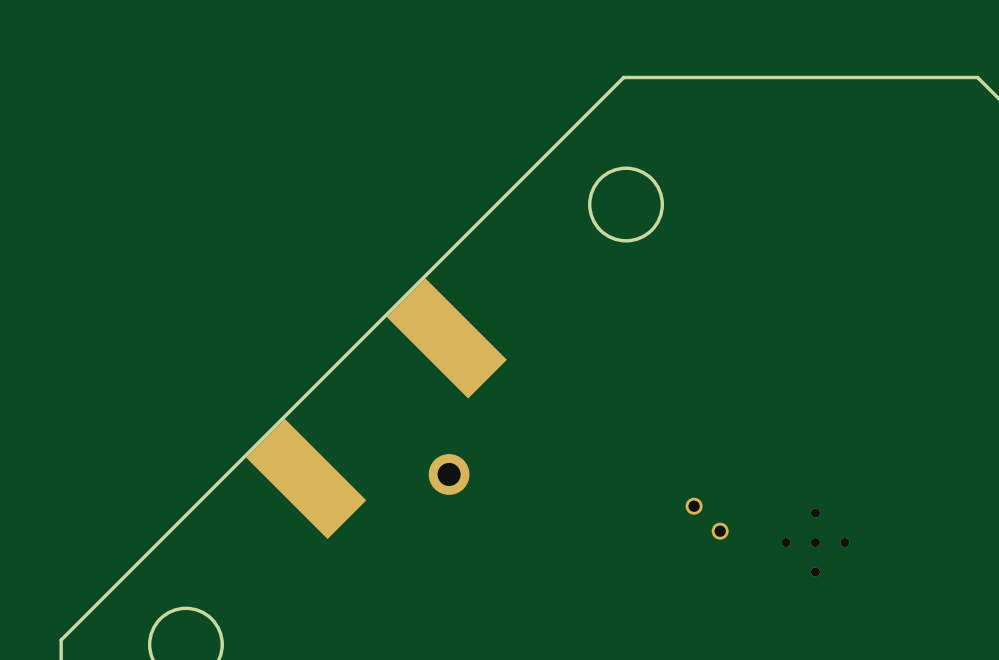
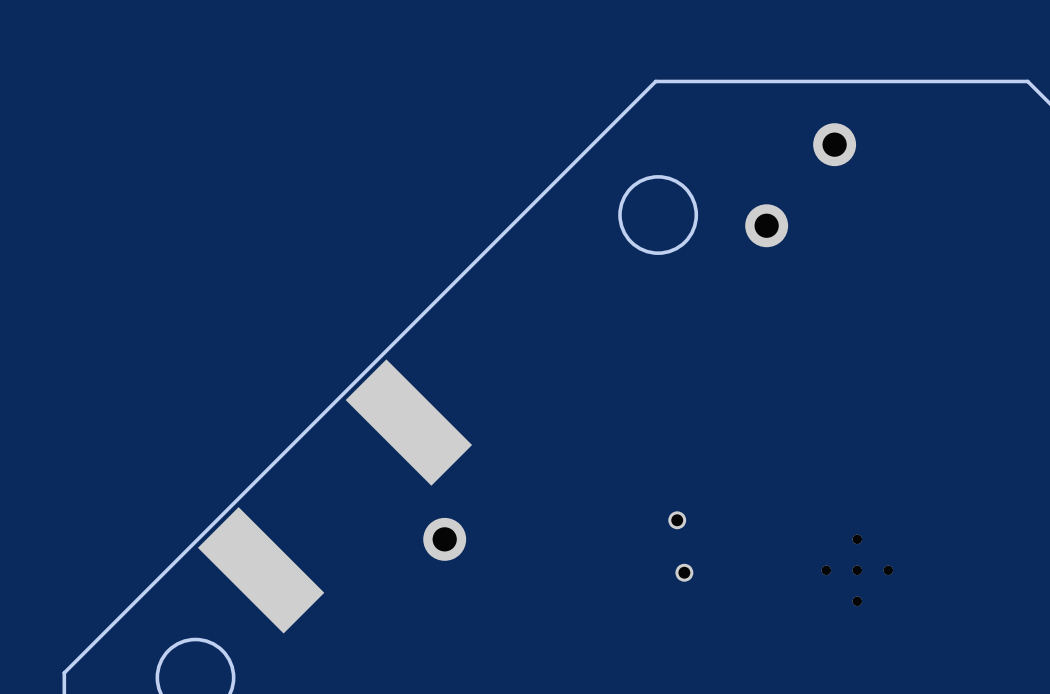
part: none -> (834, 144)
part: none -> (766, 225)
part position: (376, 408) -> (335, 496)
part position: (449, 474) -> (444, 539)
part: none -> (677, 520)
part: (694, 506) -> none
part: (720, 531) -> none
part: none -> (684, 572)

